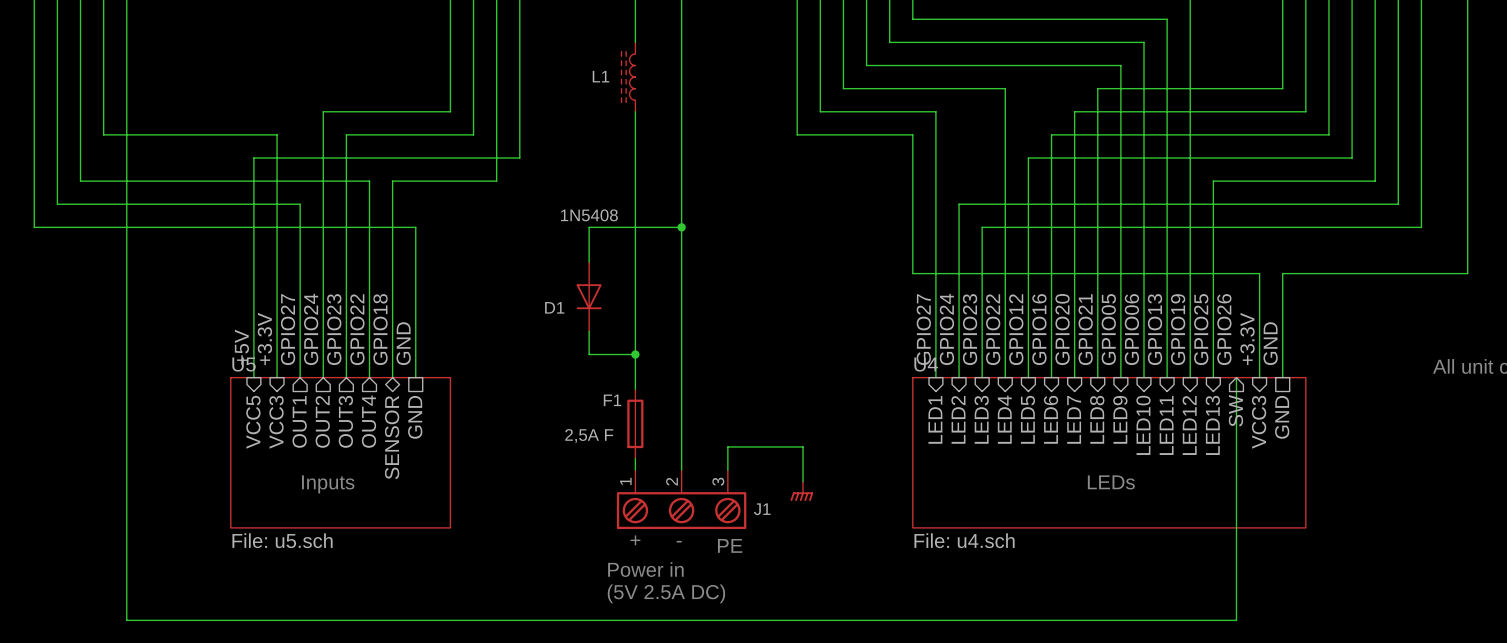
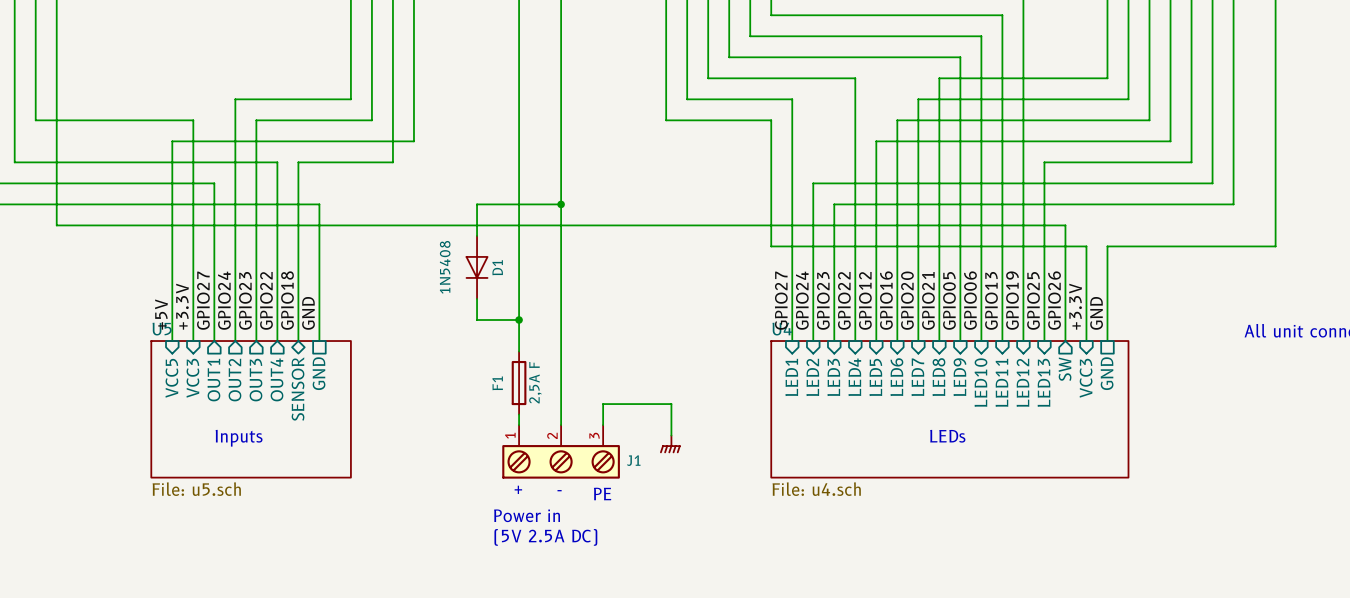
wire: none -> (519, 36) (519, 99)
L1: (628, 77) -> none
D1 value rotation: 0° (589, 215) -> 90° counterclockwise (445, 267)
D1 value position: 1N5408 (589, 215) -> 1N5408 (445, 267)
wire: (126, 250) (126, 620) (1236, 620) (1236, 377) -> (56, 225) (1065, 225) (1065, 341)
D1 name rotation: 0° (554, 307) -> 90° counterclockwise (497, 267)
D1 name position: D1 (554, 307) -> D1 (497, 267)
F1 name rotation: 0° (612, 400) -> 90° counterclockwise (497, 383)
F1 value rotation: 0° (589, 435) -> 90° counterclockwise (535, 382)

